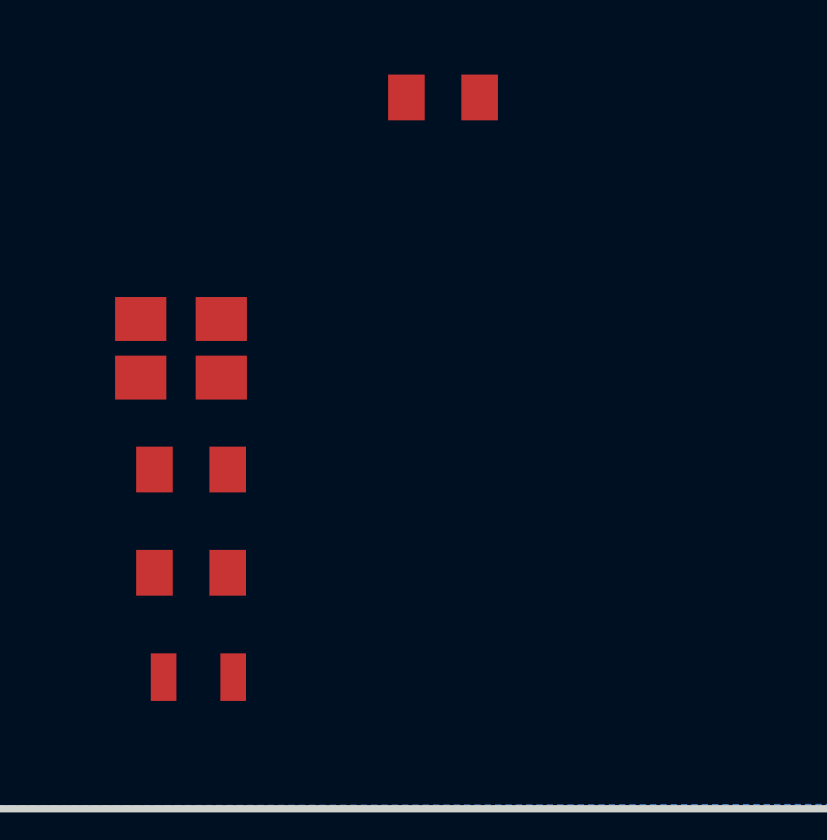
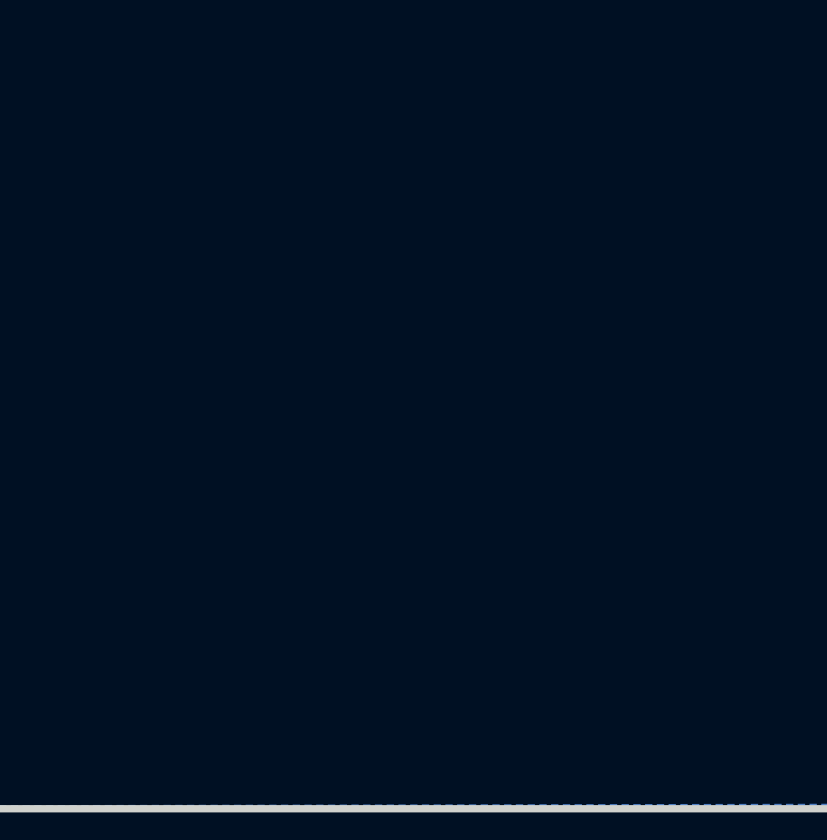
part: (443, 97) -> none
part: (181, 348) -> none
part: (191, 469) -> none
part: (191, 572) -> none
part: (198, 677) -> none

